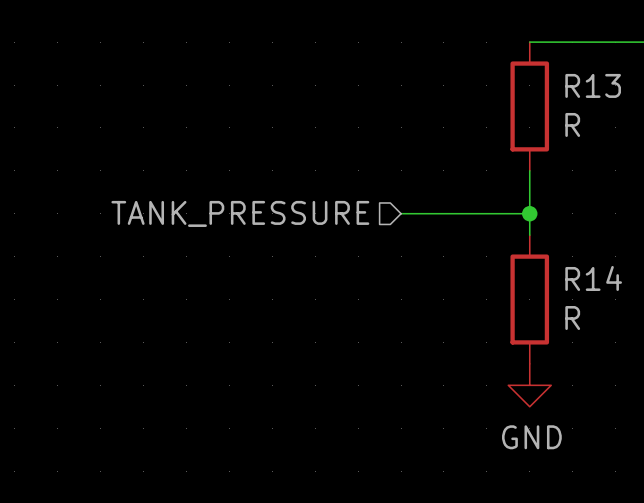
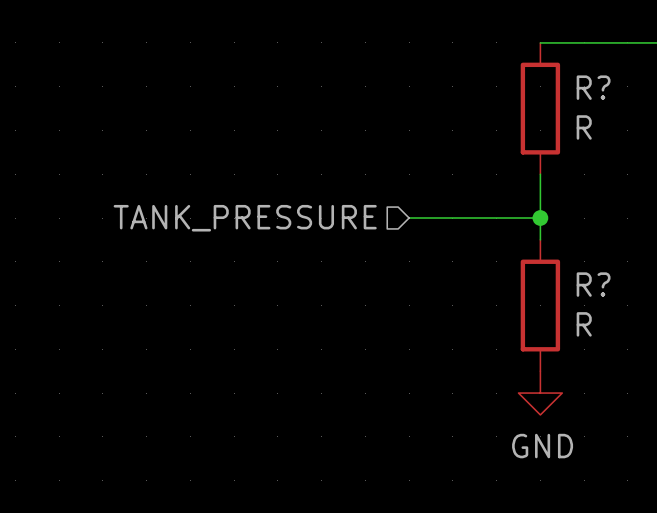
R13 name: R13 (593, 85) -> R? (593, 87)
R14 name: R14 (593, 278) -> R? (593, 284)

